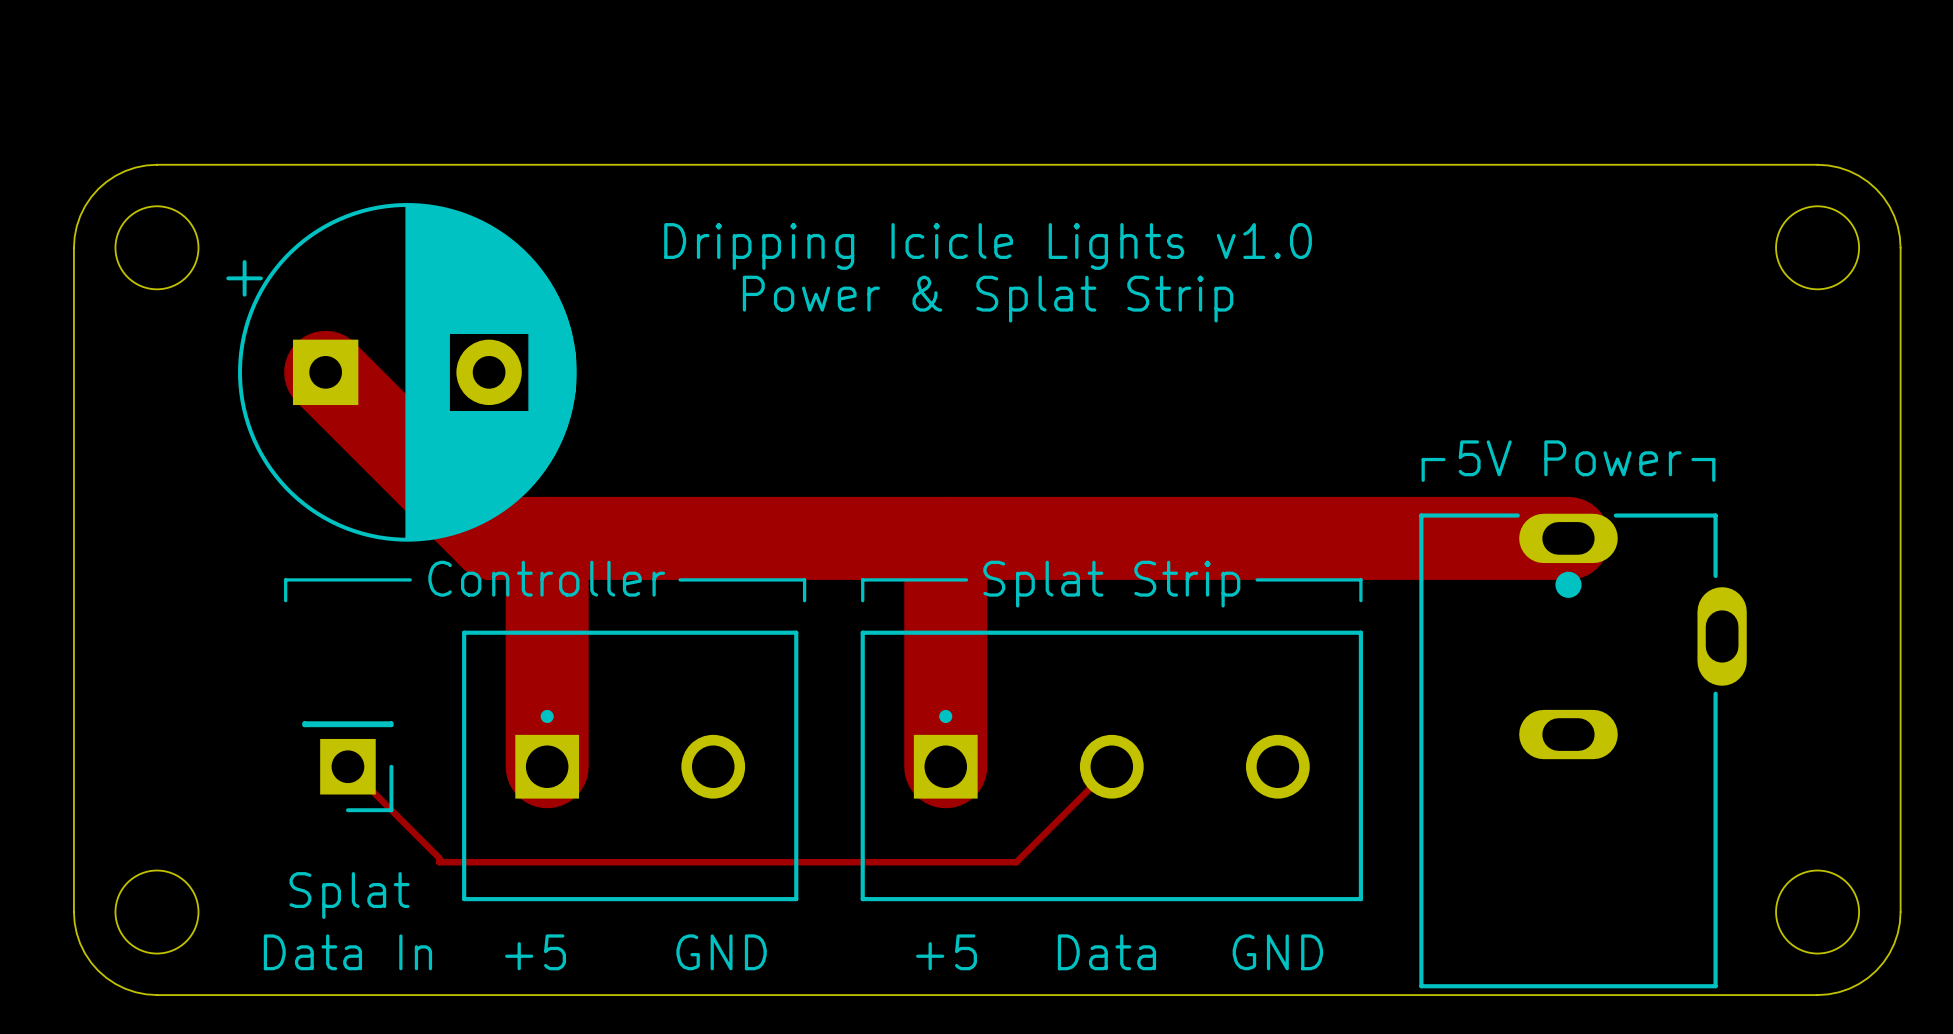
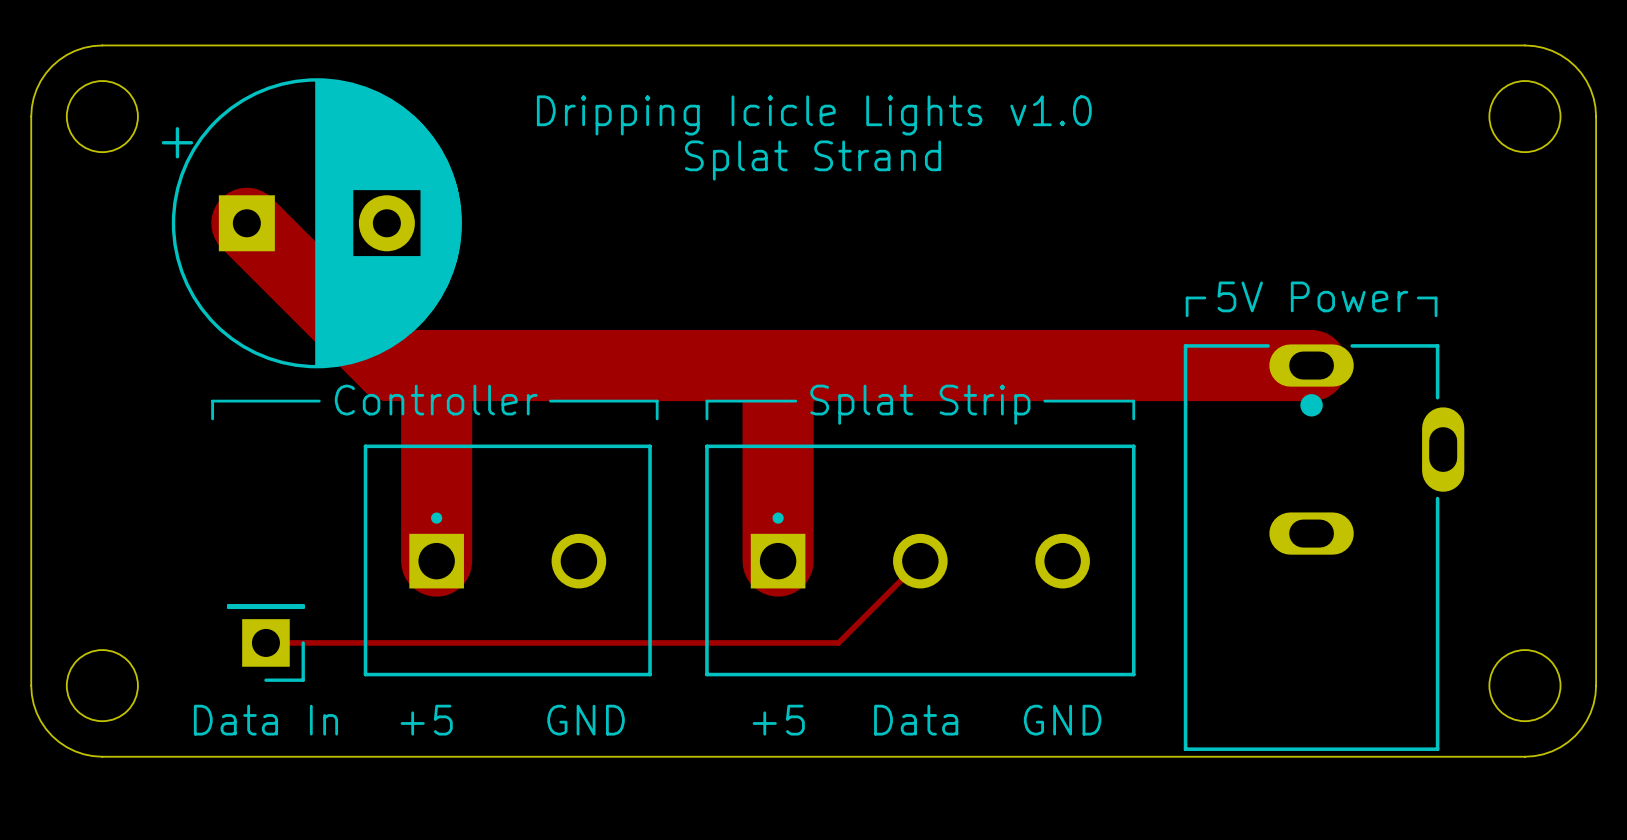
text: Power & Splat Strip (988, 299) -> Splat Strand (812, 160)
track: (347, 766) (439, 858) (439, 862) -> (265, 642) (344, 642)
part position: (347, 766) -> (265, 642)
text: Splat (349, 895) -> none

